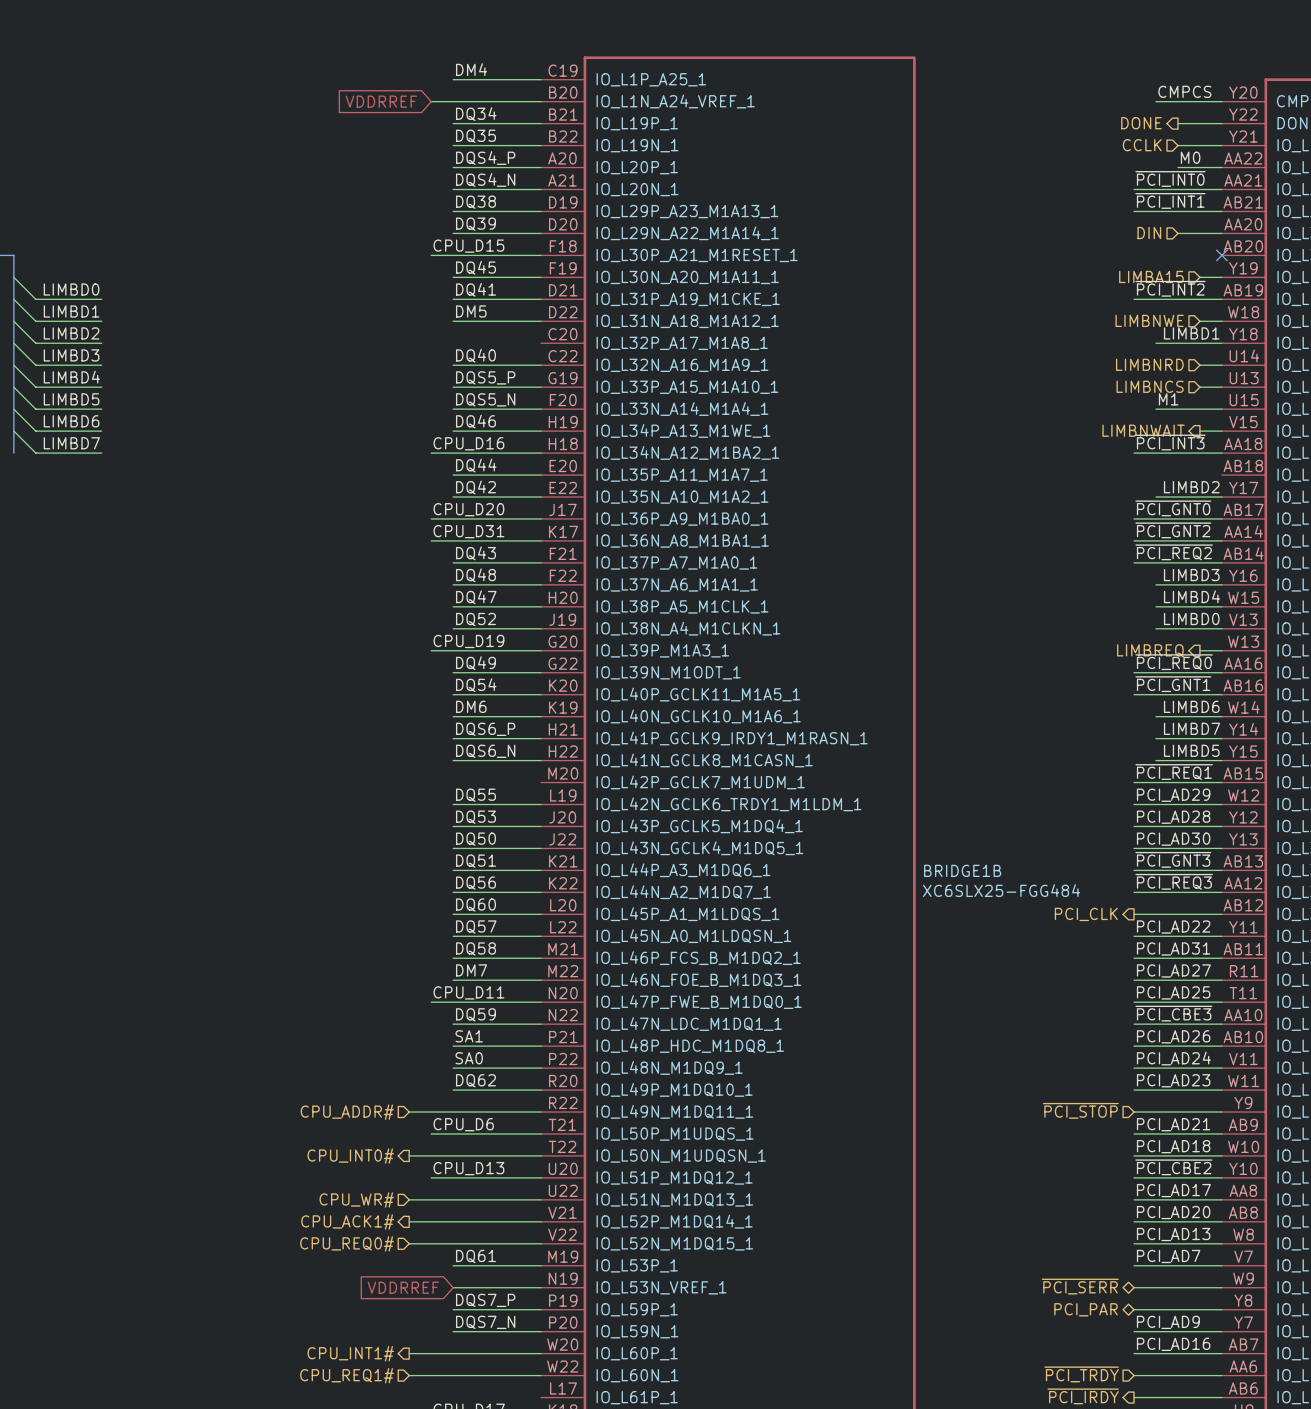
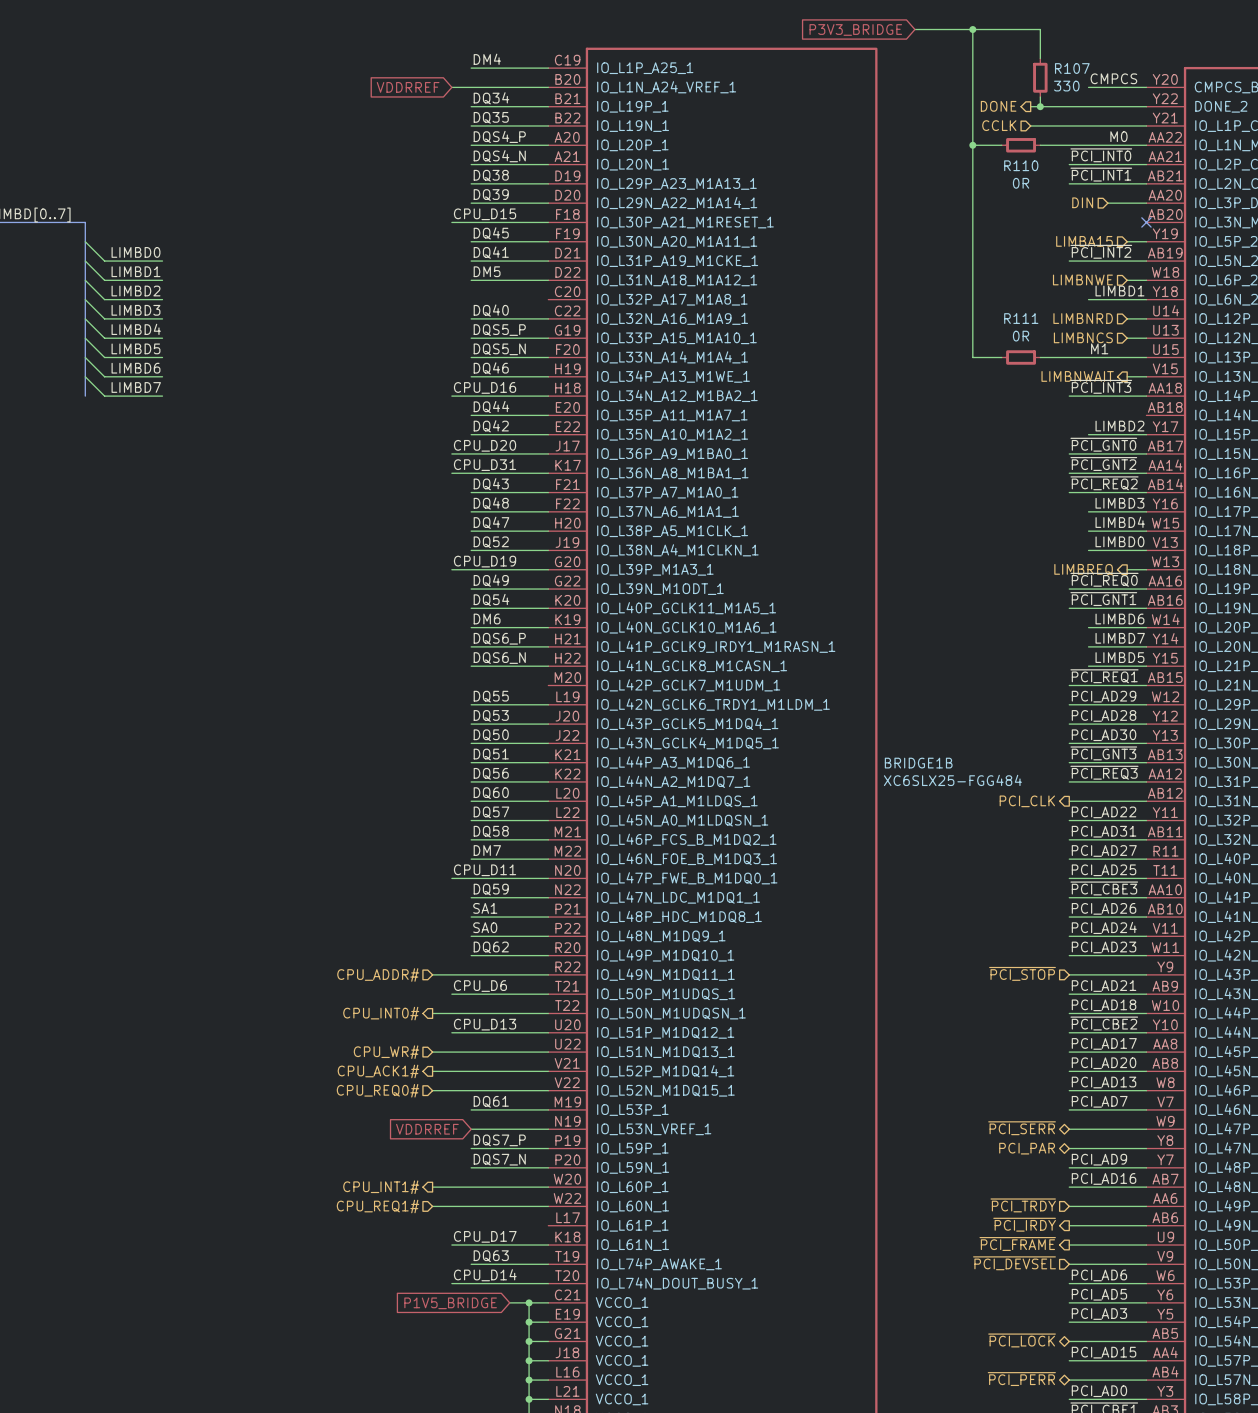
wire: none -> (914, 29) (1040, 29) (1040, 58)
wire: none -> (972, 29) (972, 357) (1001, 357)
junction: none -> (972, 29)
global label: none -> P3V3_BRIDGE (855, 29)
R107: none -> 330 (1040, 77)
wire: none -> (1040, 97) (1040, 106)
wire: none -> (1030, 106) (1107, 106)
junction: none -> (1040, 106)
hierarchical label position: DONE (1141, 123) -> DONE (998, 106)
wire: none -> (1030, 125) (1107, 125)
hierarchical label position: CCLK (1142, 145) -> CCLK (999, 125)
wire: none -> (972, 145) (1001, 145)
junction: none -> (972, 145)
R110: none -> 0R (1021, 145)
wire: none -> (1040, 145) (1107, 145)
R111: none -> 0R (1021, 357)
wire: none -> (1040, 357) (1088, 357)

